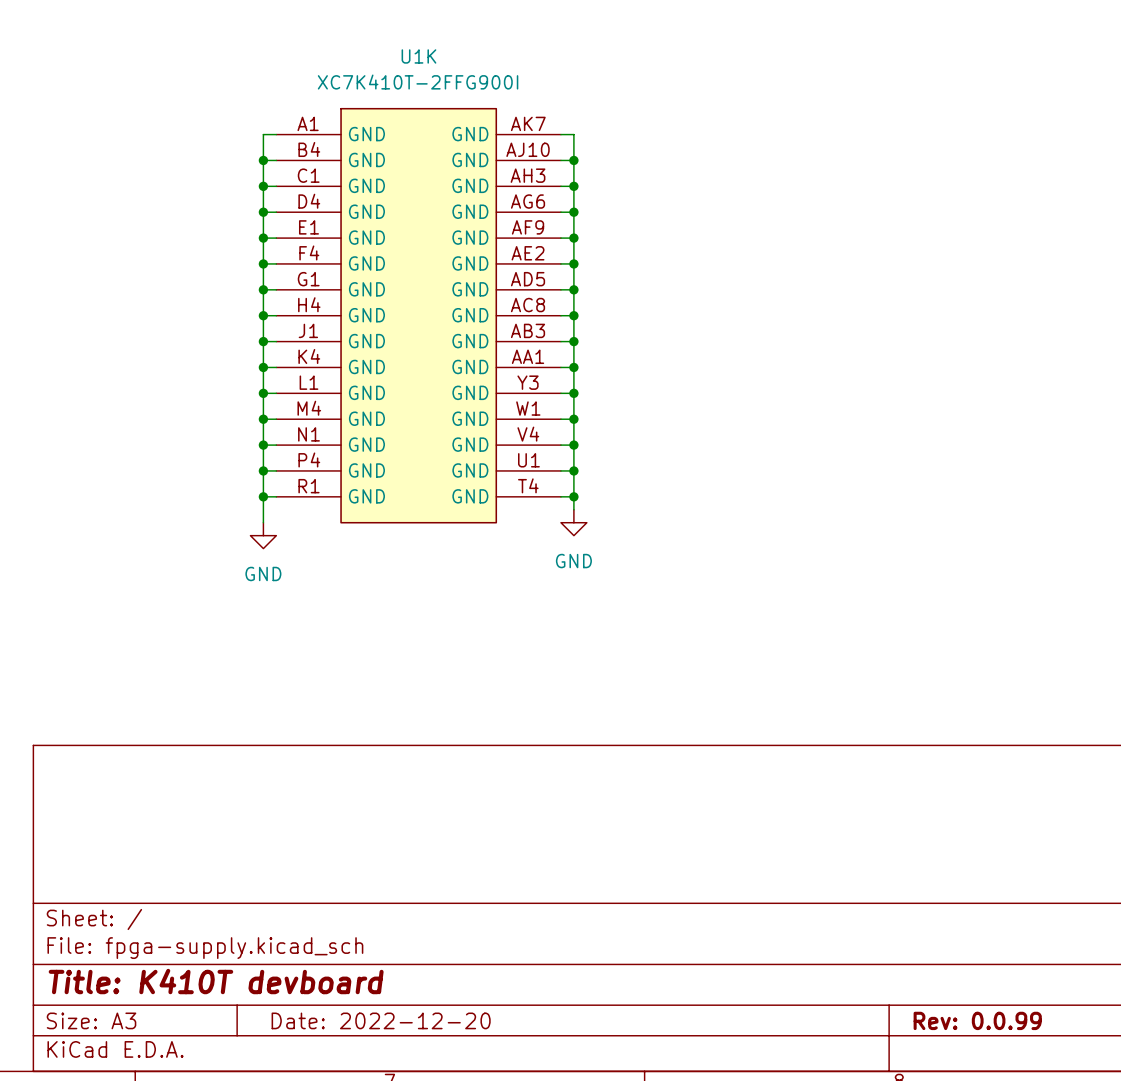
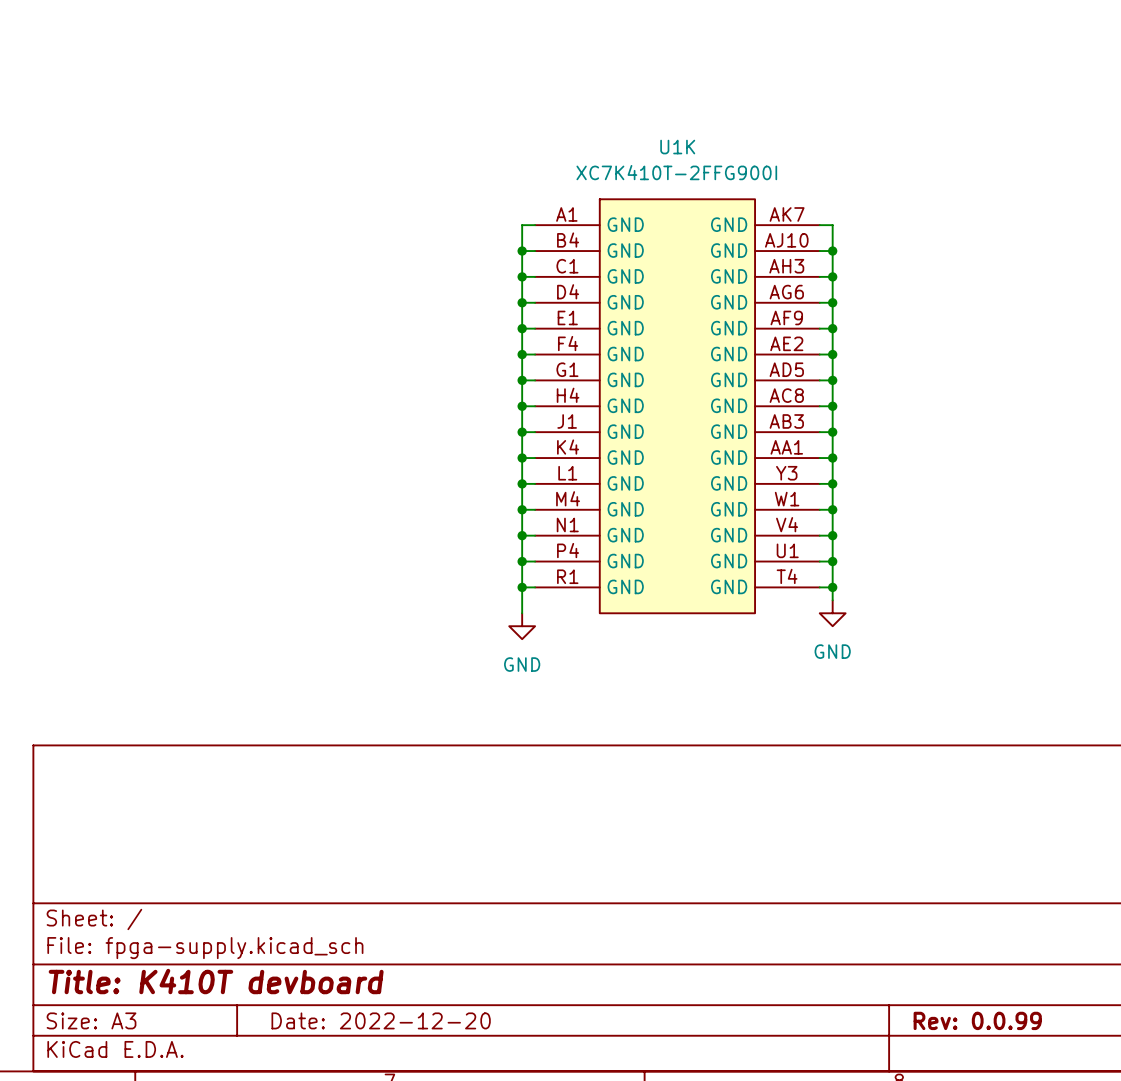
wire: (276, 134) (263, 134) (263, 522) -> none
wire: (560, 134) (573, 134) (573, 509) -> none
wire: (263, 160) (276, 160) -> none
junction: (263, 160) -> none
wire: (560, 160) (573, 160) -> (522, 251) (535, 251)
junction: (573, 160) -> none
wire: (263, 186) (276, 186) -> none
junction: (263, 186) -> none
wire: (560, 186) (573, 186) -> (522, 276) (535, 276)
junction: (573, 186) -> none
wire: (263, 212) (276, 212) -> none
junction: (263, 212) -> none
wire: (560, 212) (573, 212) -> (522, 302) (535, 302)
junction: (573, 212) -> none
wire: none -> (535, 225) (522, 225) (522, 613)
wire: none -> (819, 225) (832, 225) (832, 600)
wire: (263, 238) (276, 238) -> none
junction: (263, 238) -> none
wire: (560, 238) (573, 238) -> (522, 328) (535, 328)
junction: (573, 238) -> none
junction: none -> (522, 251)
wire: none -> (819, 251) (832, 251)
junction: none -> (832, 251)
wire: (263, 263) (276, 263) -> none
junction: (263, 263) -> none
wire: (560, 263) (573, 263) -> (522, 354) (535, 354)
junction: (573, 263) -> none
junction: none -> (522, 276)
wire: none -> (819, 276) (832, 276)
junction: none -> (832, 276)
wire: (263, 289) (276, 289) -> none
junction: (263, 289) -> none
wire: (560, 289) (573, 289) -> (522, 380) (535, 380)
junction: (573, 289) -> none
junction: none -> (522, 302)
wire: none -> (819, 302) (832, 302)
junction: none -> (832, 302)
wire: (263, 315) (276, 315) -> none
junction: (263, 315) -> none
U1K position: (418, 315) -> (677, 406)
wire: (560, 315) (573, 315) -> (522, 406) (535, 406)
junction: (573, 315) -> none
junction: none -> (522, 328)
wire: none -> (819, 328) (832, 328)
junction: none -> (832, 328)
wire: (263, 341) (276, 341) -> none
junction: (263, 341) -> none
wire: (560, 341) (573, 341) -> (522, 432) (535, 432)
junction: (573, 341) -> none
junction: none -> (522, 354)
wire: none -> (819, 354) (832, 354)
junction: none -> (832, 354)
wire: (263, 367) (276, 367) -> none
junction: (263, 367) -> none
wire: (560, 367) (573, 367) -> (522, 458) (535, 458)
junction: (573, 367) -> none
junction: none -> (522, 380)
wire: none -> (819, 380) (832, 380)
junction: none -> (832, 380)
wire: (263, 393) (276, 393) -> none
junction: (263, 393) -> none
wire: (560, 393) (573, 393) -> (522, 483) (535, 483)
junction: (573, 393) -> none
junction: none -> (522, 406)
wire: none -> (819, 406) (832, 406)
junction: none -> (832, 406)
wire: (263, 419) (276, 419) -> none
junction: (263, 419) -> none
wire: (560, 419) (573, 419) -> (522, 509) (535, 509)
junction: (573, 419) -> none
junction: none -> (522, 432)
wire: none -> (819, 432) (832, 432)
junction: none -> (832, 432)
wire: (263, 445) (276, 445) -> none
junction: (263, 445) -> none
wire: (560, 445) (573, 445) -> (522, 535) (535, 535)
junction: (573, 445) -> none
junction: none -> (522, 458)
wire: none -> (819, 458) (832, 458)
junction: none -> (832, 458)
wire: (263, 470) (276, 470) -> none
junction: (263, 470) -> none
wire: (560, 470) (573, 470) -> (522, 561) (535, 561)
junction: (573, 470) -> none
junction: none -> (522, 483)
wire: none -> (819, 483) (832, 483)
junction: none -> (832, 483)
wire: (263, 496) (276, 496) -> none
junction: (263, 496) -> none
wire: (560, 496) (573, 496) -> (522, 587) (535, 587)
junction: (573, 496) -> none
junction: none -> (522, 509)
wire: none -> (819, 509) (832, 509)
junction: none -> (832, 509)
power symbol position: GND (573, 522) -> GND (522, 626)
power symbol: GND (263, 535) -> none
junction: none -> (522, 535)
wire: none -> (819, 535) (832, 535)
junction: none -> (832, 535)
junction: none -> (522, 561)
wire: none -> (819, 561) (832, 561)
junction: none -> (832, 561)
junction: none -> (522, 587)
wire: none -> (819, 587) (832, 587)
junction: none -> (832, 587)
power symbol: none -> GND (832, 613)

